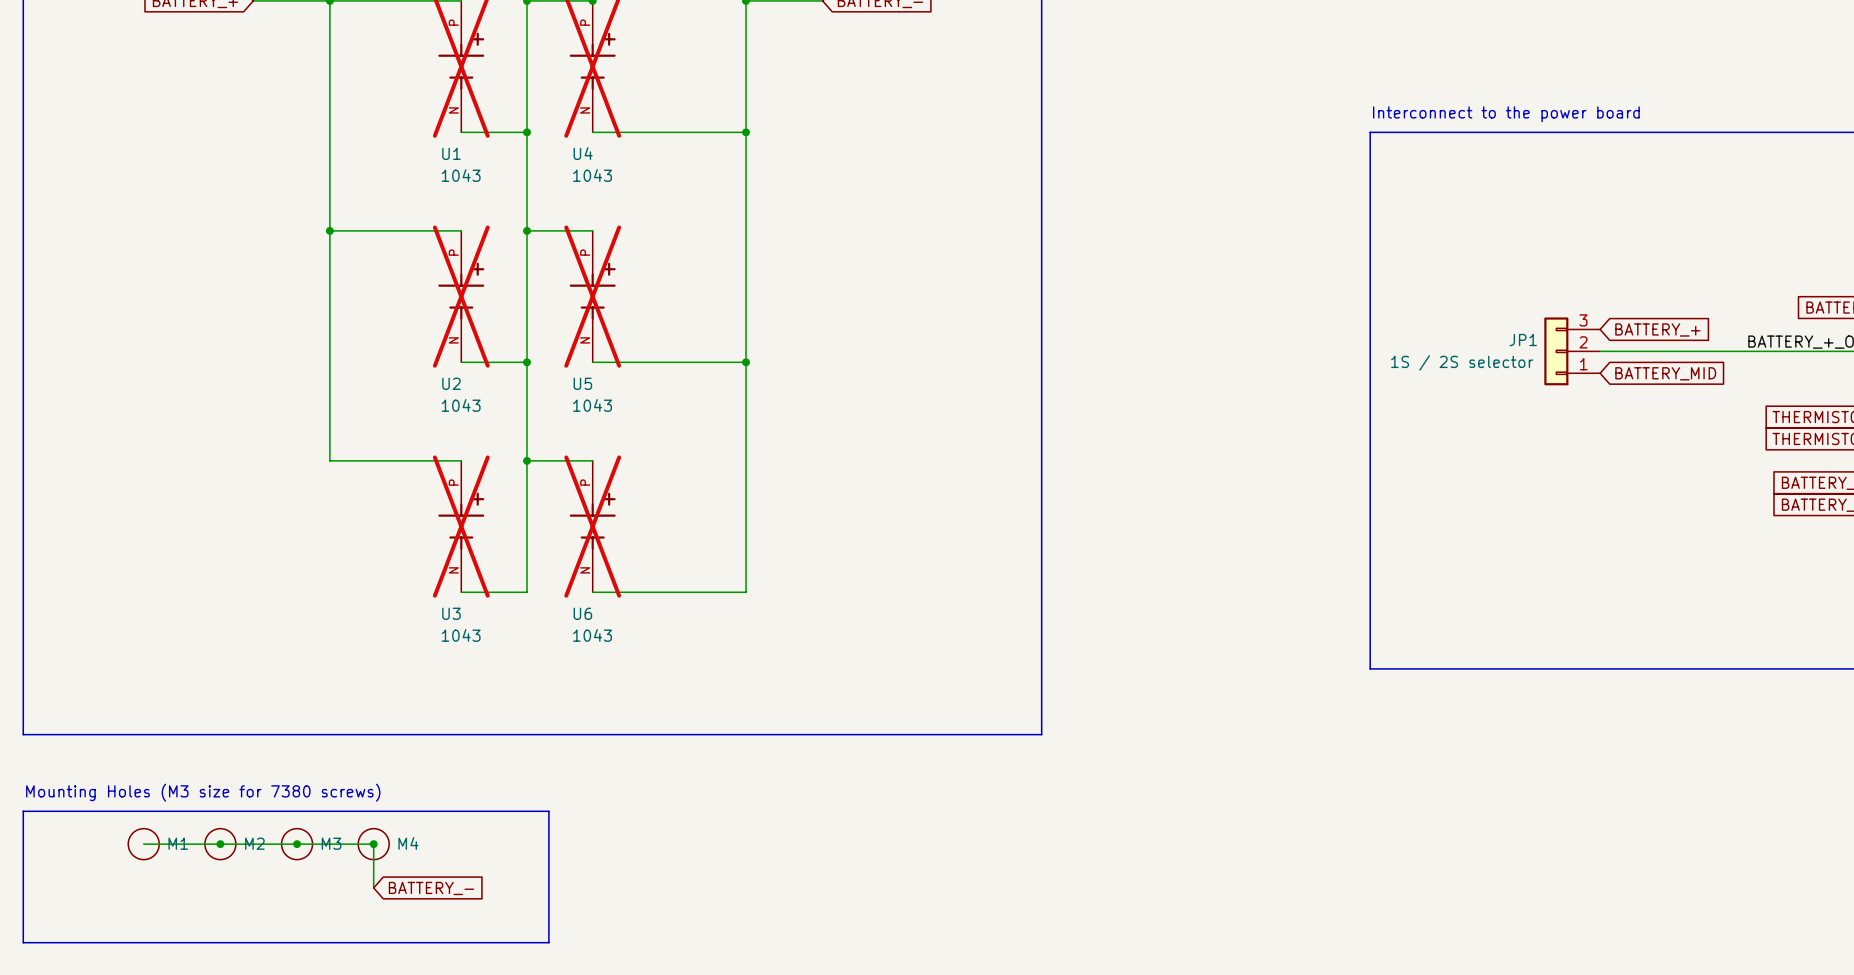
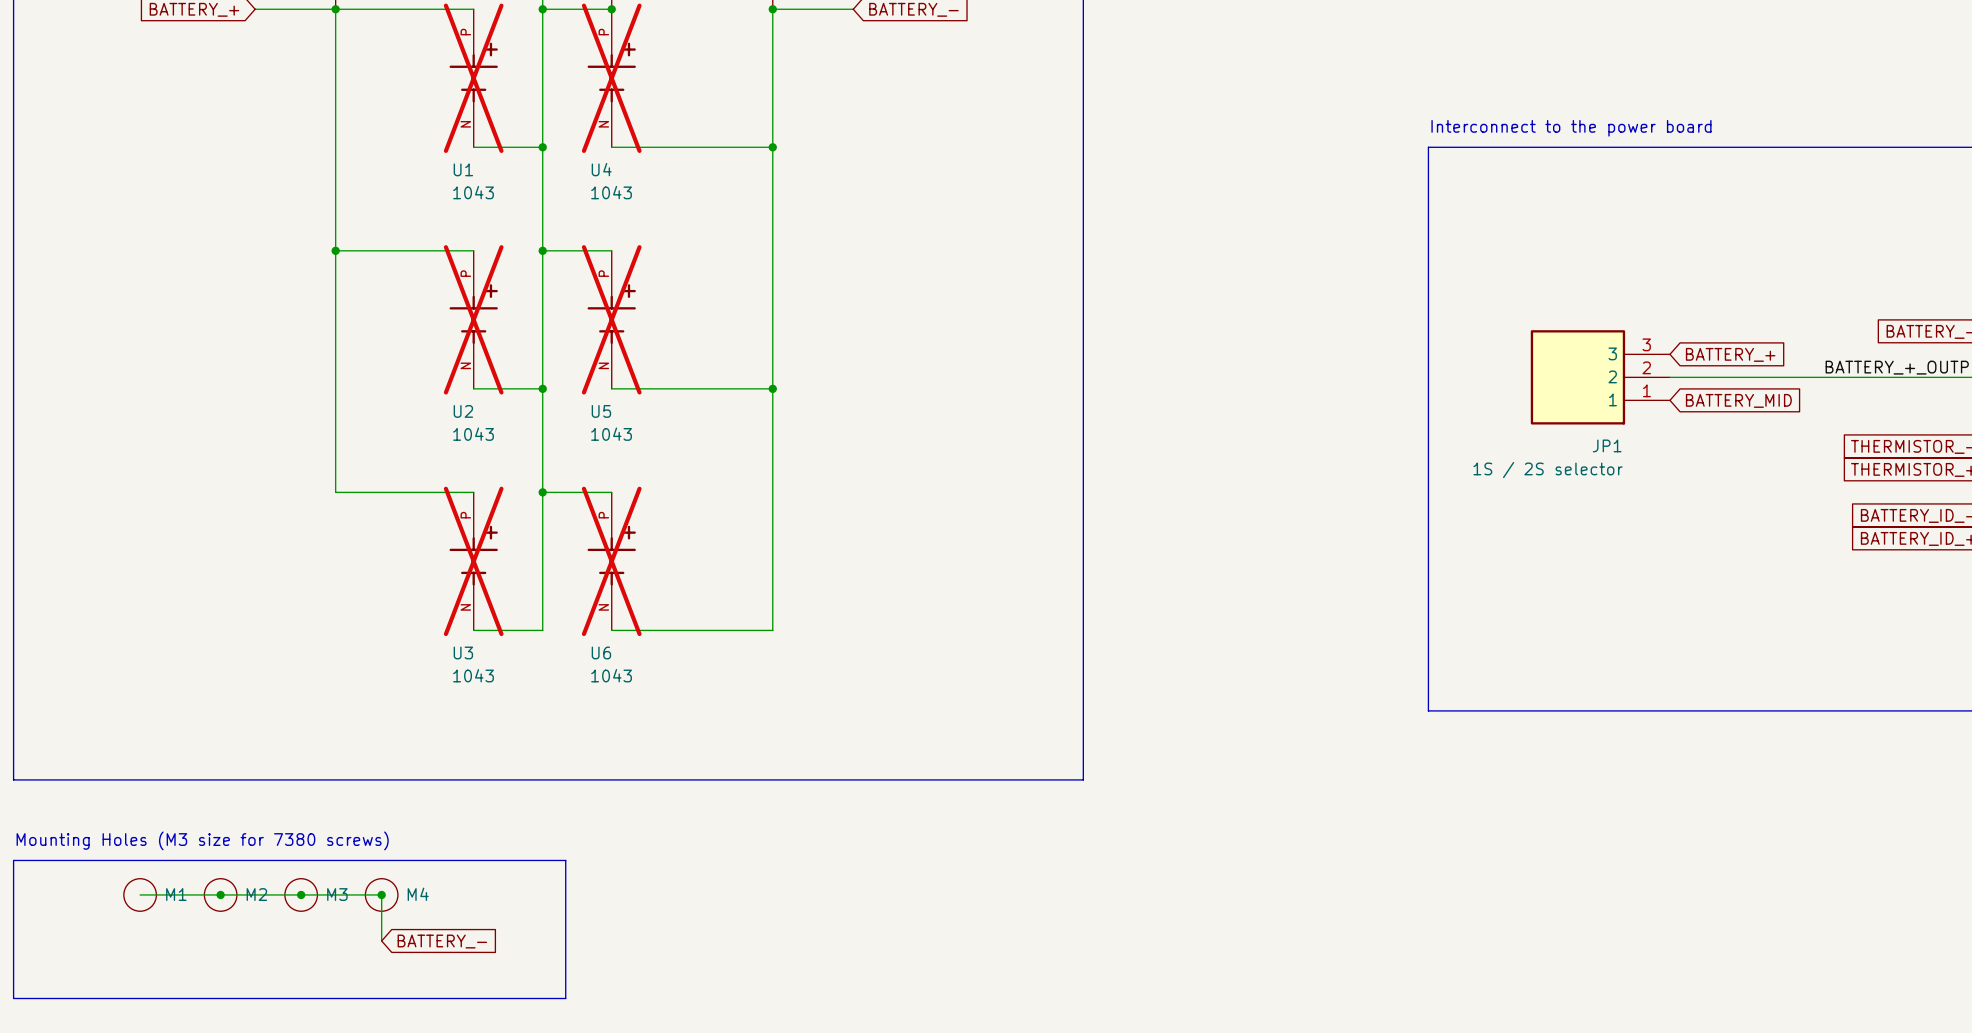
JP1 symbol: [1544, 317, 1601, 386] -> [1530, 330, 1670, 425]
JP1 name position: JP1 (1523, 340) -> JP1 (1607, 445)
JP1 text position: 1S / 2S selector (1462, 362) -> 1S / 2S selector (1548, 470)

